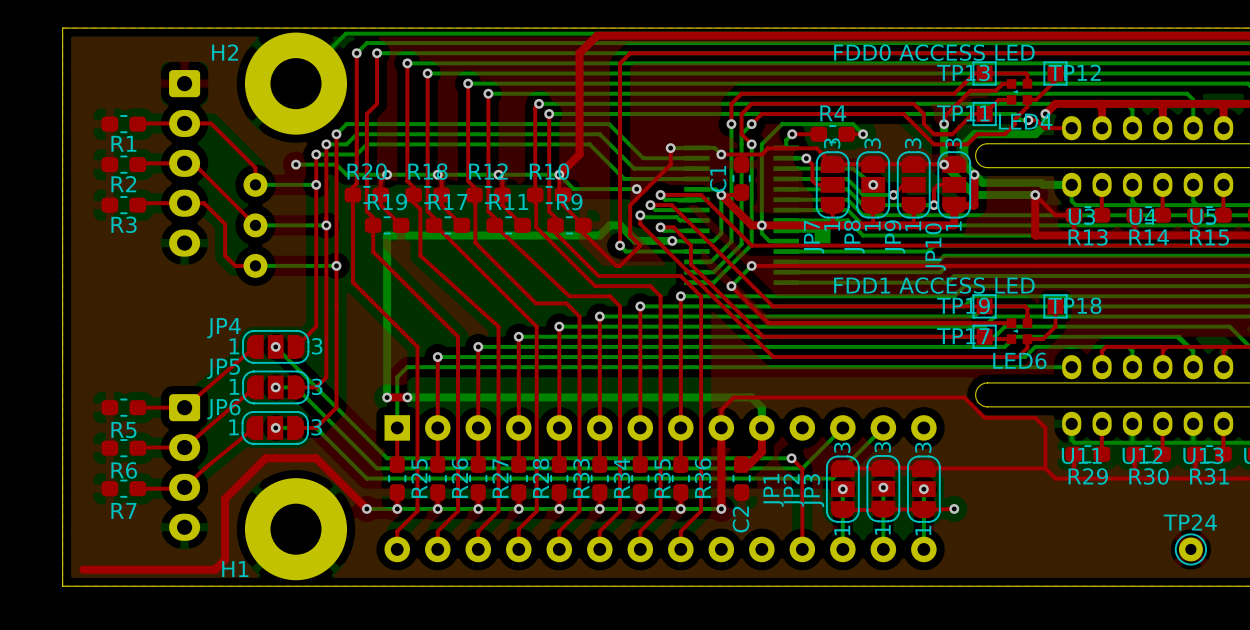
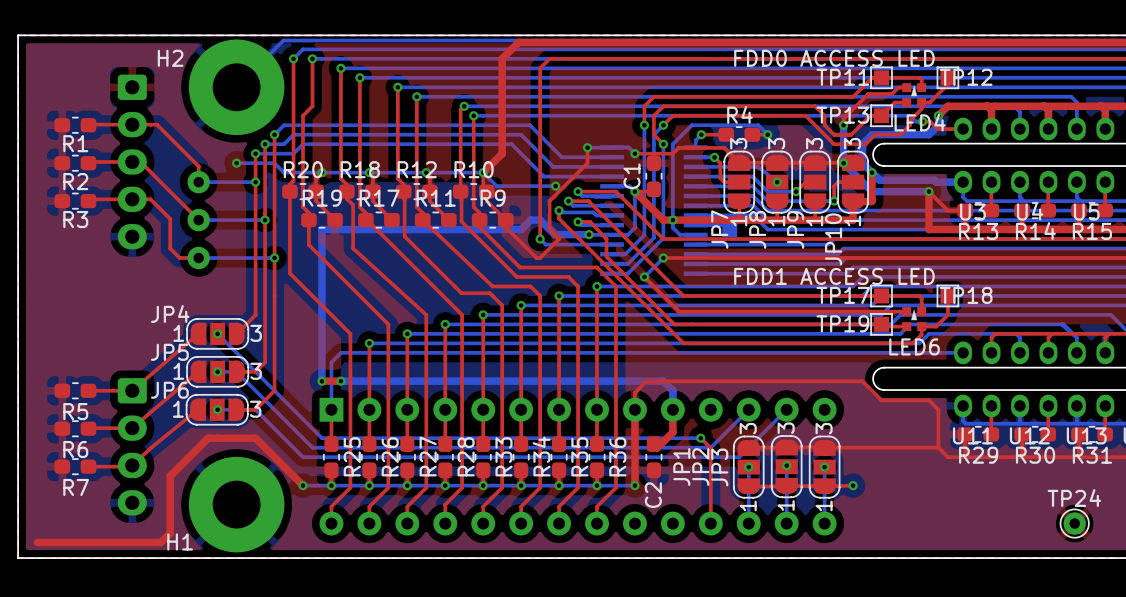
TP13 name: TP13 (963, 72) -> TP11 (842, 77)
LED4 footprint: [1006, 79, 1033, 105] -> [902, 83, 927, 108]
TP11 name: TP11 (963, 113) -> TP13 (842, 115)
TP19 name: TP19 (963, 305) -> TP17 (843, 295)
LED6 footprint: [1006, 318, 1033, 344] -> [902, 307, 927, 332]
TP17 name: TP17 (963, 336) -> TP19 (842, 323)

